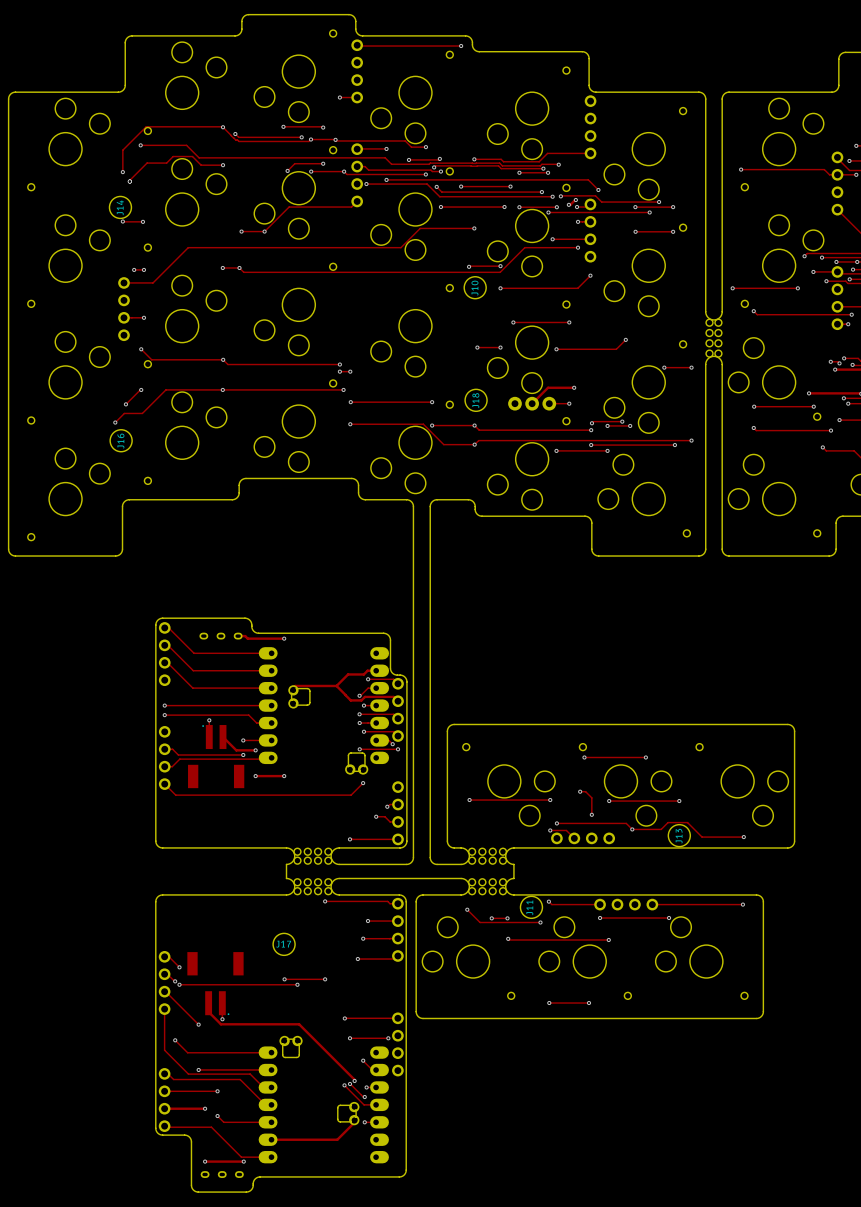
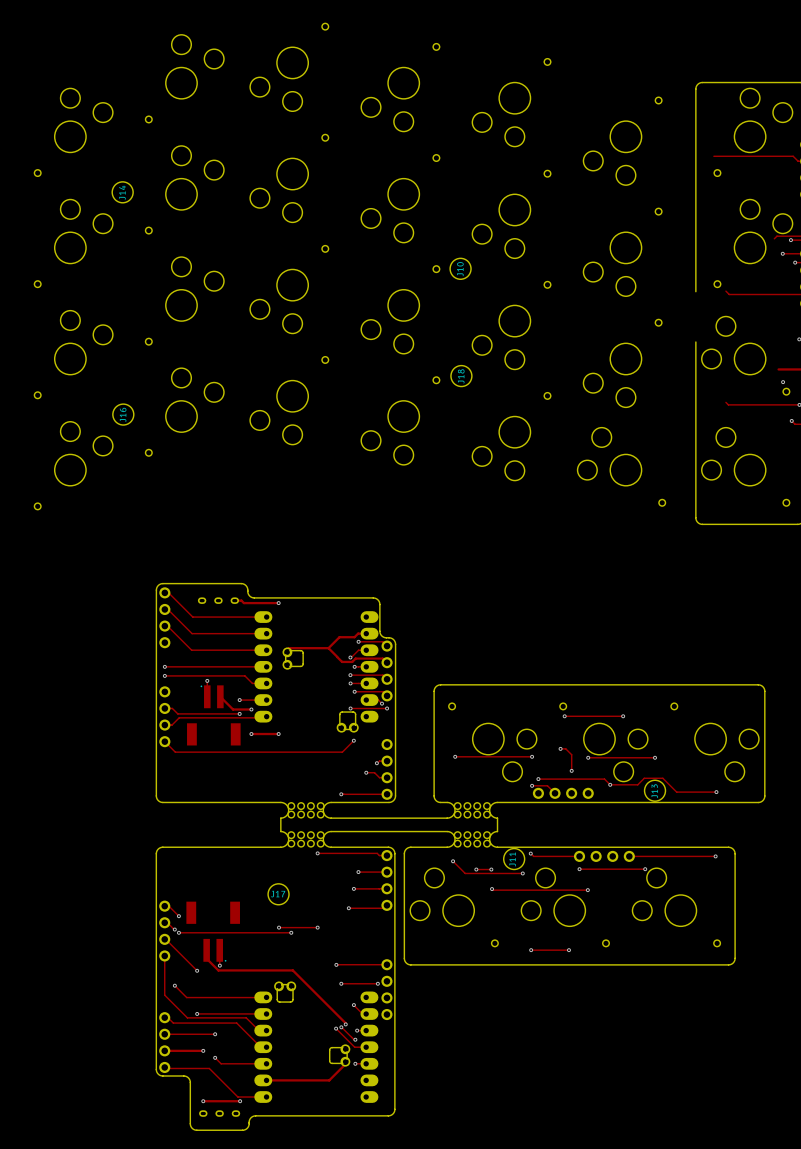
track: (357, 45) (461, 46) -> none
via: (461, 46) -> none
part: (357, 71) -> none
track: (339, 97) (357, 97) -> none
via: (339, 97) -> none
board edge: (705, 99) (703, 94) (699, 92) (594, 92) (589, 86) (589, 57) (584, 52) (478, 51) (473, 48) (470, 38) (466, 35) (361, 35) (356, 31) (354, 17) (348, 14) (247, 14) (242, 19) (241, 32) (235, 35) (130, 36) (125, 42) (125, 86) (121, 91) (15, 92) (8, 96) (9, 552) (15, 556) (117, 555) (122, 549) (122, 505) (125, 500) (233, 499) (238, 495) (239, 482) (245, 478) (352, 478) (357, 482) (358, 495) (363, 499) (410, 501) (413, 506) (413, 857) (411, 862) (406, 864) -> none
board edge: (705, 99) (705, 311) -> none
track: (283, 126) (323, 127) -> none
via: (283, 126) -> none
via: (223, 127) -> none
via: (323, 127) -> none
part: (590, 127) -> none
track: (235, 134) (238, 137) (301, 137) -> none
via: (235, 134) -> none
via: (301, 137) -> none
via: (310, 139) -> none
via: (335, 139) -> none
track: (140, 145) (186, 145) (199, 157) (385, 157) (391, 164) (558, 164) -> none
via: (140, 145) -> none
track: (425, 147) (411, 147) (405, 140) (311, 139) (309, 141) (238, 141) (222, 126) (146, 126) (122, 150) (122, 172) -> none
via: (425, 147) -> none
track: (386, 148) (357, 149) -> none
via: (386, 148) -> none
track: (590, 153) (547, 153) (539, 161) (474, 159) -> none
track: (439, 158) (408, 159) -> none
via: (439, 158) -> none
via: (408, 159) -> none
via: (474, 159) -> none
track: (323, 163) (294, 163) (287, 170) -> none
via: (323, 163) -> none
via: (558, 164) -> none
track: (223, 165) (201, 165) (192, 156) (173, 156) (166, 163) (147, 163) (129, 181) -> none
via: (223, 165) -> none
track: (357, 166) (365, 166) (368, 170) (440, 171) -> none
track: (434, 167) (498, 165) (501, 168) (543, 168) -> none
via: (434, 167) -> none
via: (543, 168) -> none
via: (741, 169) -> none
via: (287, 170) -> none
track: (311, 171) (344, 171) (347, 174) (425, 174) -> none
via: (311, 171) -> none
via: (344, 171) -> none
via: (440, 171) -> none
via: (122, 172) -> none
track: (519, 172) (548, 172) -> none
via: (519, 172) -> none
via: (548, 172) -> none
via: (425, 174) -> none
part: (357, 175) -> none
track: (386, 179) (588, 179) (598, 190) -> none
via: (386, 179) -> none
via: (129, 181) -> none
track: (366, 184) (427, 184) (439, 196) (552, 196) -> none
via: (366, 184) -> none
track: (436, 186) (441, 192) (541, 192) -> none
via: (436, 186) -> none
track: (461, 186) (510, 186) -> none
via: (461, 186) -> none
via: (510, 186) -> none
via: (598, 190) -> none
via: (541, 192) -> none
via: (552, 196) -> none
track: (560, 196) (595, 195) (601, 202) (659, 202) -> none
via: (560, 196) -> none
track: (575, 200) (568, 204) -> none
via: (575, 200) -> none
track: (357, 201) (351, 207) (289, 207) (264, 231) (241, 231) -> none
via: (659, 202) -> none
via: (568, 204) -> none
track: (590, 204) (587, 207) (577, 207) -> none
track: (440, 207) (504, 207) -> none
via: (440, 207) -> none
via: (504, 207) -> none
track: (519, 207) (556, 207) -> none
via: (519, 207) -> none
via: (556, 207) -> none
via: (577, 207) -> none
track: (635, 207) (673, 207) -> none
via: (635, 207) -> none
via: (673, 207) -> none
track: (548, 212) (649, 212) -> none
via: (548, 212) -> none
via: (649, 212) -> none
track: (122, 221) (142, 221) -> none
via: (122, 221) -> none
via: (142, 221) -> none
track: (578, 221) (590, 221) -> none
via: (578, 221) -> none
track: (474, 228) (420, 228) (400, 247) (188, 247) (152, 282) (123, 282) -> none
via: (474, 228) -> none
part: (590, 230) -> none
via: (241, 231) -> none
via: (264, 231) -> none
track: (635, 231) (673, 231) -> none
via: (635, 231) -> none
via: (673, 231) -> none
track: (552, 239) (590, 239) -> none
via: (552, 239) -> none
track: (578, 247) (524, 247) (500, 272) (243, 272) (239, 267) (222, 267) -> none
via: (578, 247) -> none
via: (804, 256) -> none
via: (469, 266) -> none
track: (500, 266) (469, 266) -> none
via: (500, 266) -> none
via: (222, 267) -> none
via: (239, 267) -> none
track: (134, 269) (143, 269) -> none
via: (134, 269) -> none
via: (143, 269) -> none
track: (590, 275) (577, 288) (500, 288) -> none
via: (590, 275) -> none
via: (500, 288) -> none
track: (732, 288) (797, 288) -> none
via: (732, 288) -> none
via: (797, 288) -> none
part: (123, 309) -> none
via: (753, 311) -> none
track: (123, 317) (143, 317) -> none
via: (143, 317) -> none
track: (513, 322) (569, 322) -> none
via: (513, 322) -> none
via: (569, 322) -> none
part: (713, 338) -> none
track: (625, 339) (616, 349) (556, 349) -> none
via: (625, 339) -> none
track: (477, 347) (500, 347) -> none
via: (477, 347) -> none
via: (500, 347) -> none
track: (141, 349) (151, 359) (223, 359) (227, 364) (339, 364) -> none
via: (141, 349) -> none
via: (556, 349) -> none
via: (223, 359) -> none
via: (339, 364) -> none
board edge: (705, 364) (705, 549) (701, 555) (597, 555) (592, 550) (591, 522) (587, 516) (481, 516) (476, 513) (474, 503) (469, 499) (436, 499) (430, 503) (430, 857) (432, 862) (437, 864) -> (395, 818) (424, 818)
track: (664, 367) (691, 367) -> none
via: (664, 367) -> none
via: (691, 367) -> none
track: (339, 371) (350, 371) -> none
via: (339, 371) -> none
via: (350, 371) -> none
track: (574, 387) (548, 387) (532, 403) -> none
via: (574, 387) -> none
track: (141, 389) (125, 404) -> none
via: (141, 389) -> none
via: (222, 389) -> none
track: (343, 389) (165, 389) (142, 413) (124, 413) (115, 422) -> none
via: (343, 389) -> none
via: (809, 393) -> none
track: (350, 402) (432, 402) -> none
via: (350, 402) -> none
via: (432, 402) -> none
part: (532, 403) -> none
track: (549, 403) (569, 403) -> none
via: (569, 403) -> none
via: (125, 404) -> none
track: (754, 406) (813, 406) -> none
via: (754, 406) -> none
track: (622, 421) (593, 421) (591, 423) -> none
via: (622, 421) -> none
via: (115, 422) -> none
via: (591, 423) -> none
track: (350, 424) (423, 424) (443, 444) (474, 444) (478, 440) (691, 440) -> none
via: (350, 424) -> none
track: (432, 425) (474, 425) (479, 430) (591, 430) -> none
via: (432, 425) -> none
via: (474, 425) -> none
track: (607, 425) (630, 425) -> none
via: (607, 425) -> none
via: (630, 425) -> none
via: (753, 427) -> none
via: (591, 430) -> none
via: (691, 440) -> none
via: (474, 444) -> none
track: (591, 445) (674, 445) -> none
via: (591, 445) -> none
via: (674, 445) -> none
track: (556, 450) (607, 450) -> none
via: (556, 450) -> none
via: (607, 450) -> none

